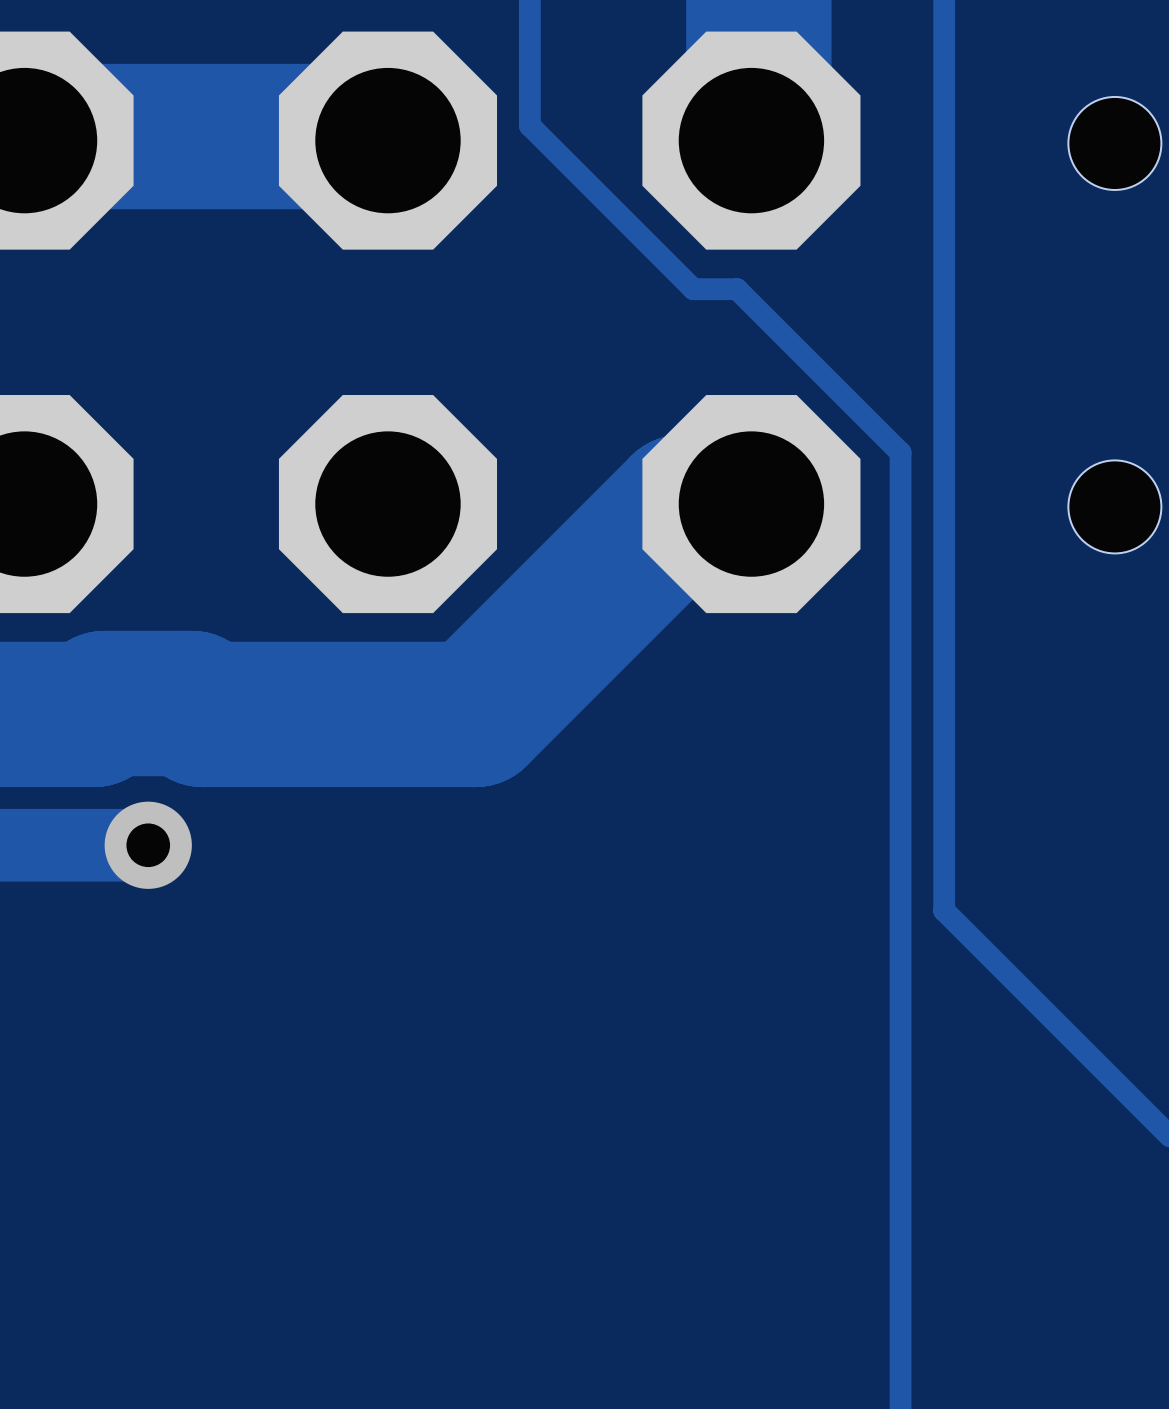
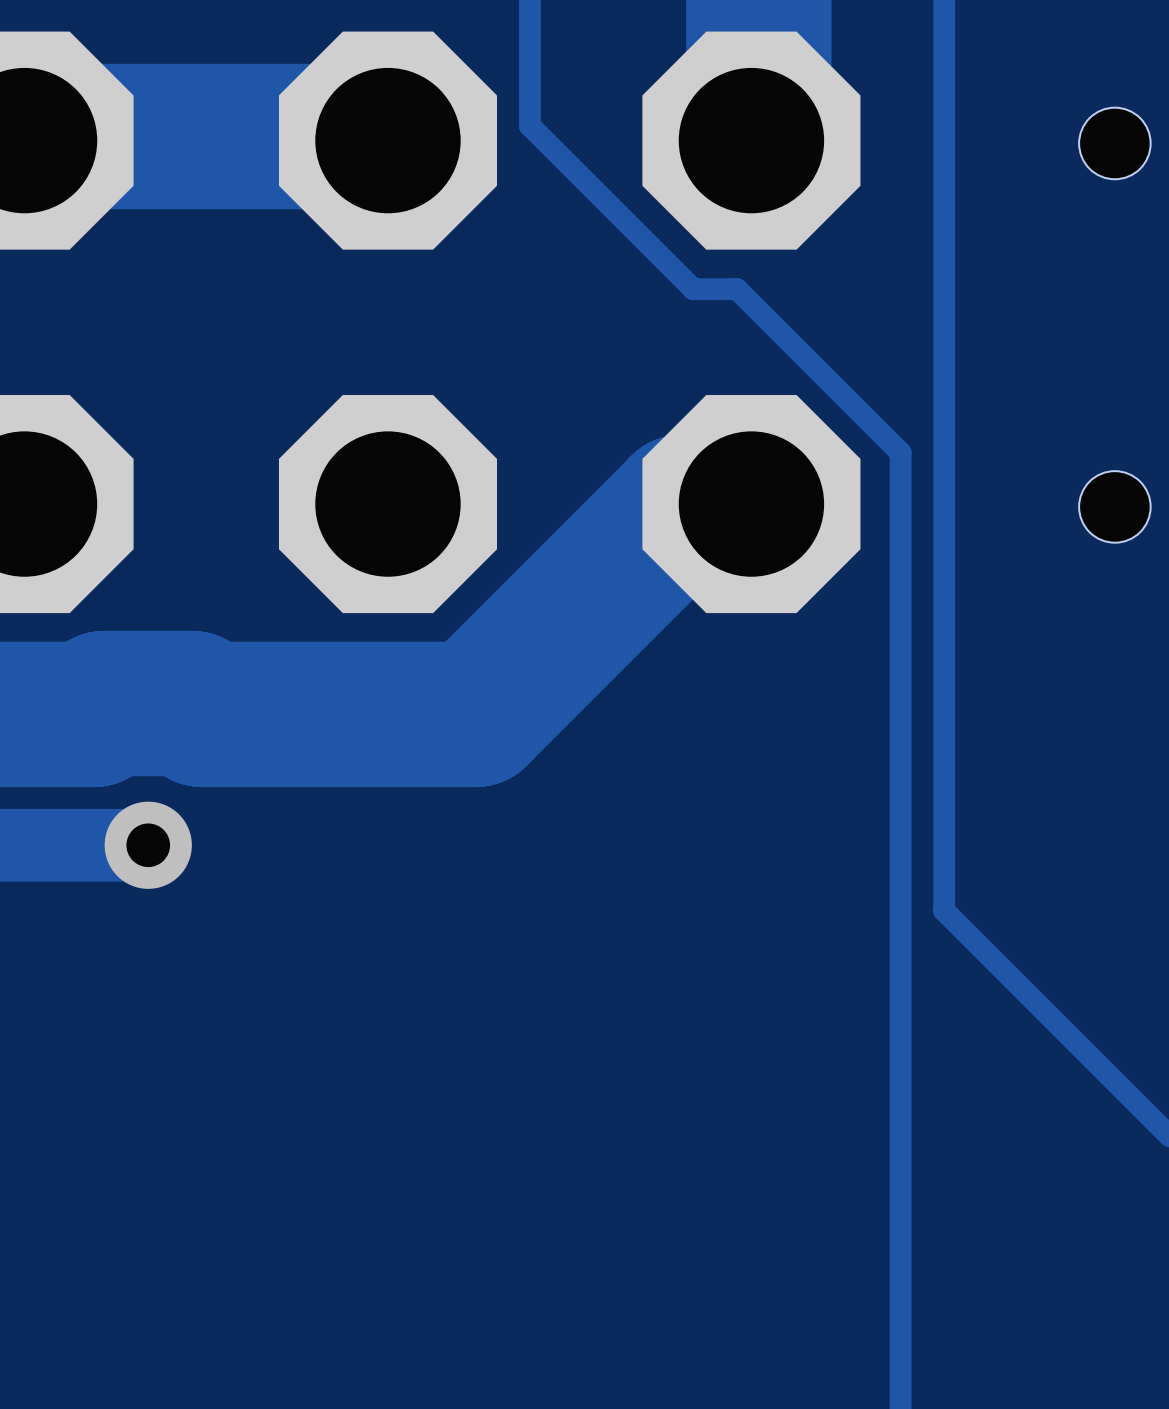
hole size: [1068, 96, 1162, 190] -> [1079, 107, 1151, 180]
hole size: [1068, 460, 1162, 554] -> [1079, 471, 1151, 543]

